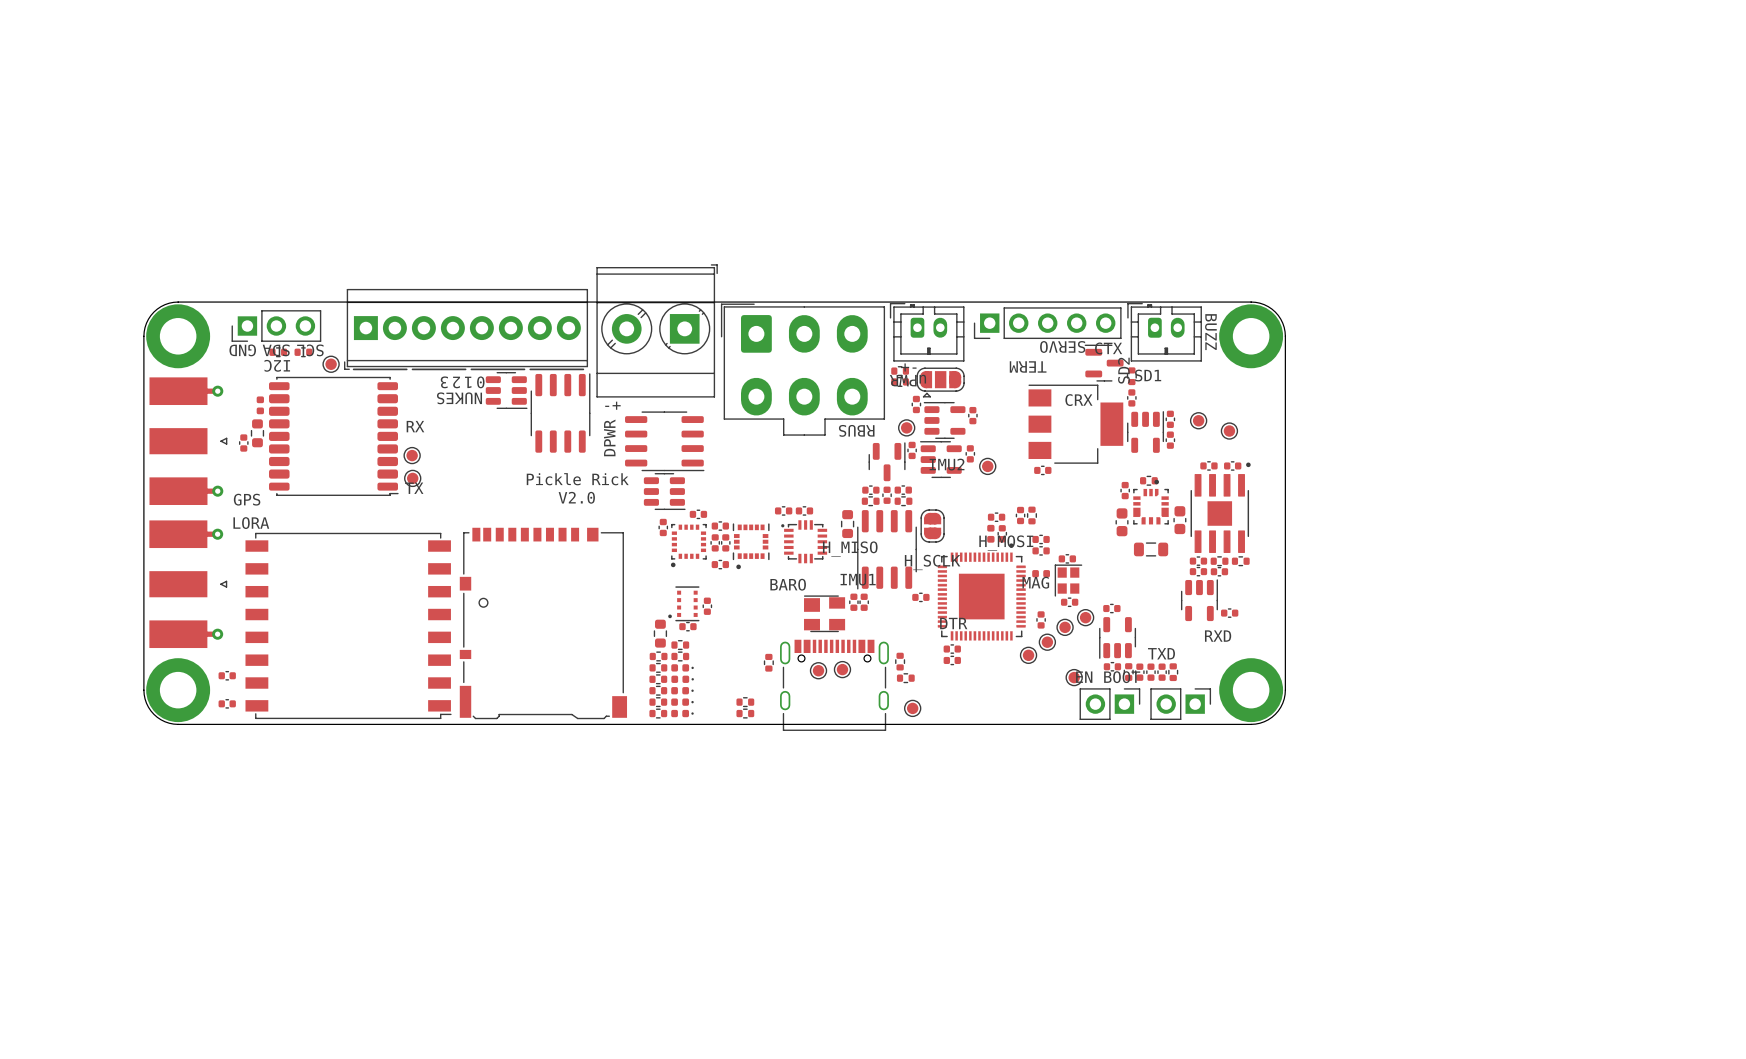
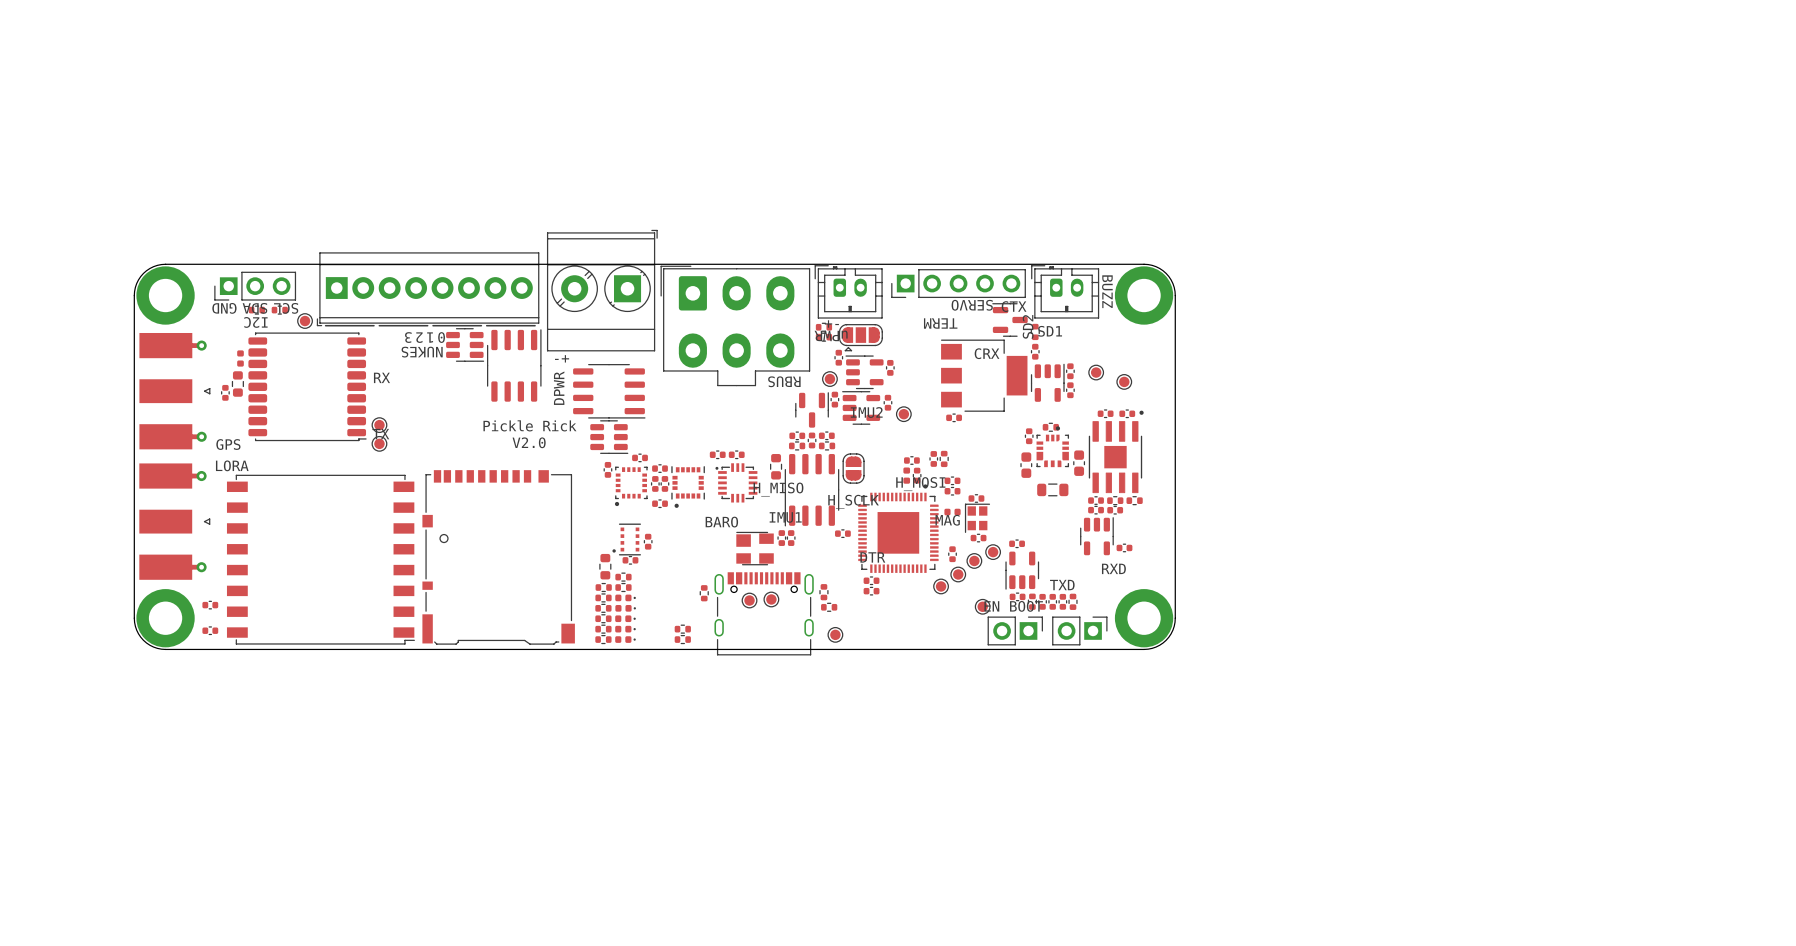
part position: (412, 455) -> (379, 443)

